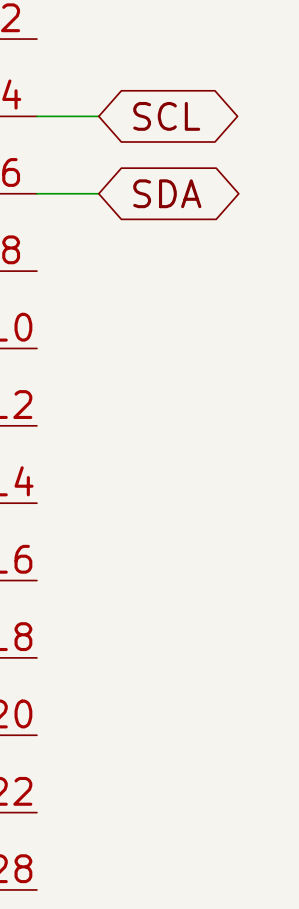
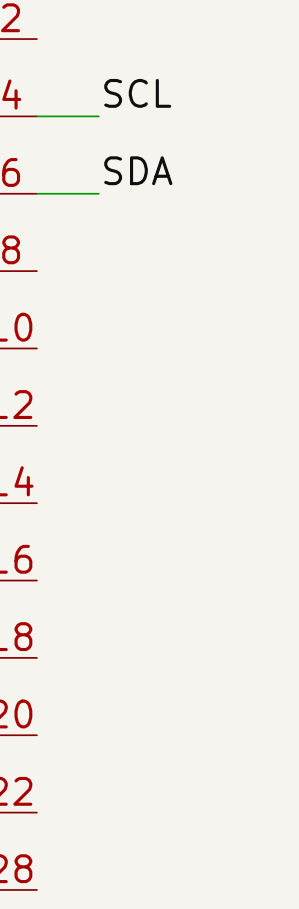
label: none -> SCL (137, 93)
global label: SCL (166, 116) -> none
label: none -> SDA (138, 170)
global label: SDA (167, 193) -> none

